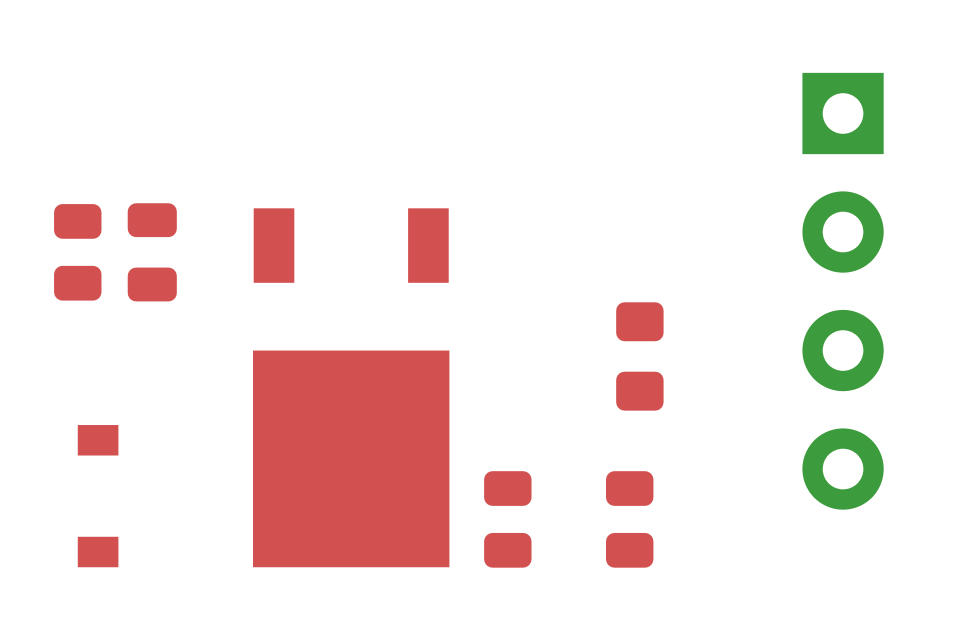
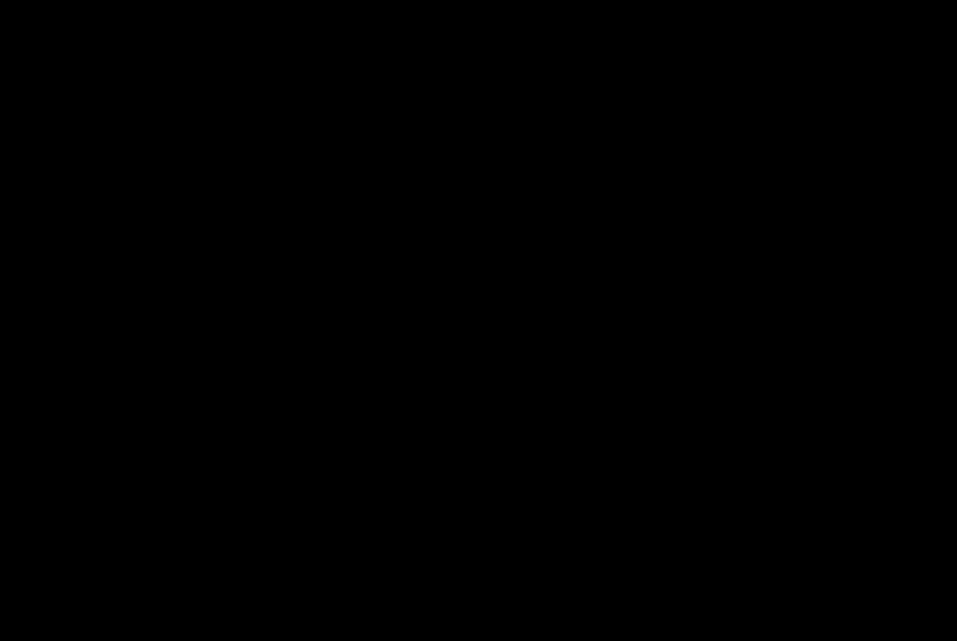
part: (77, 252) -> none
part: (152, 252) -> none
part: (843, 291) -> none
part: (639, 356) -> none
part: (351, 387) -> none
part: (98, 496) -> none
part: (507, 519) -> none
part: (629, 519) -> none

